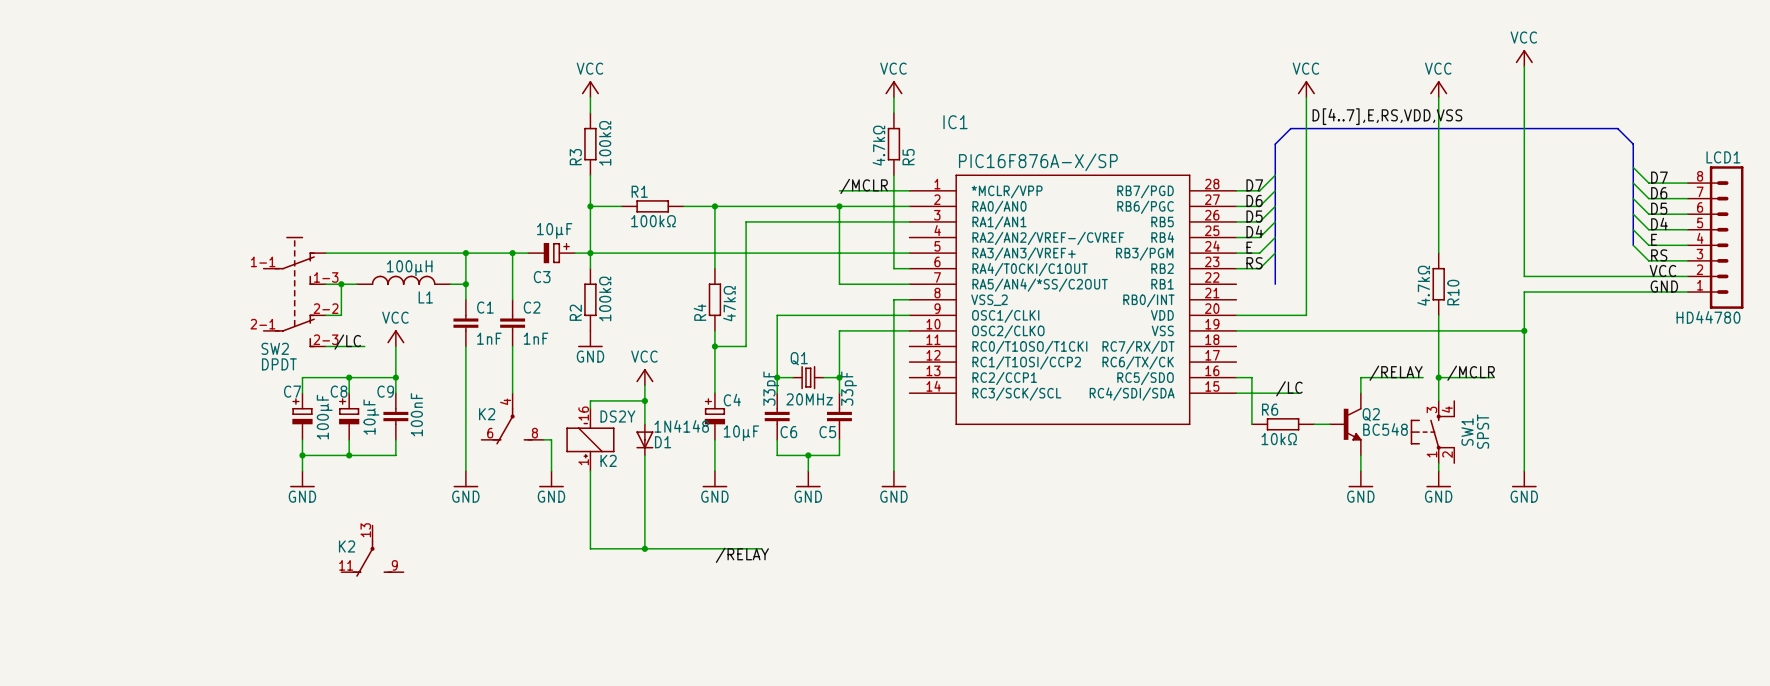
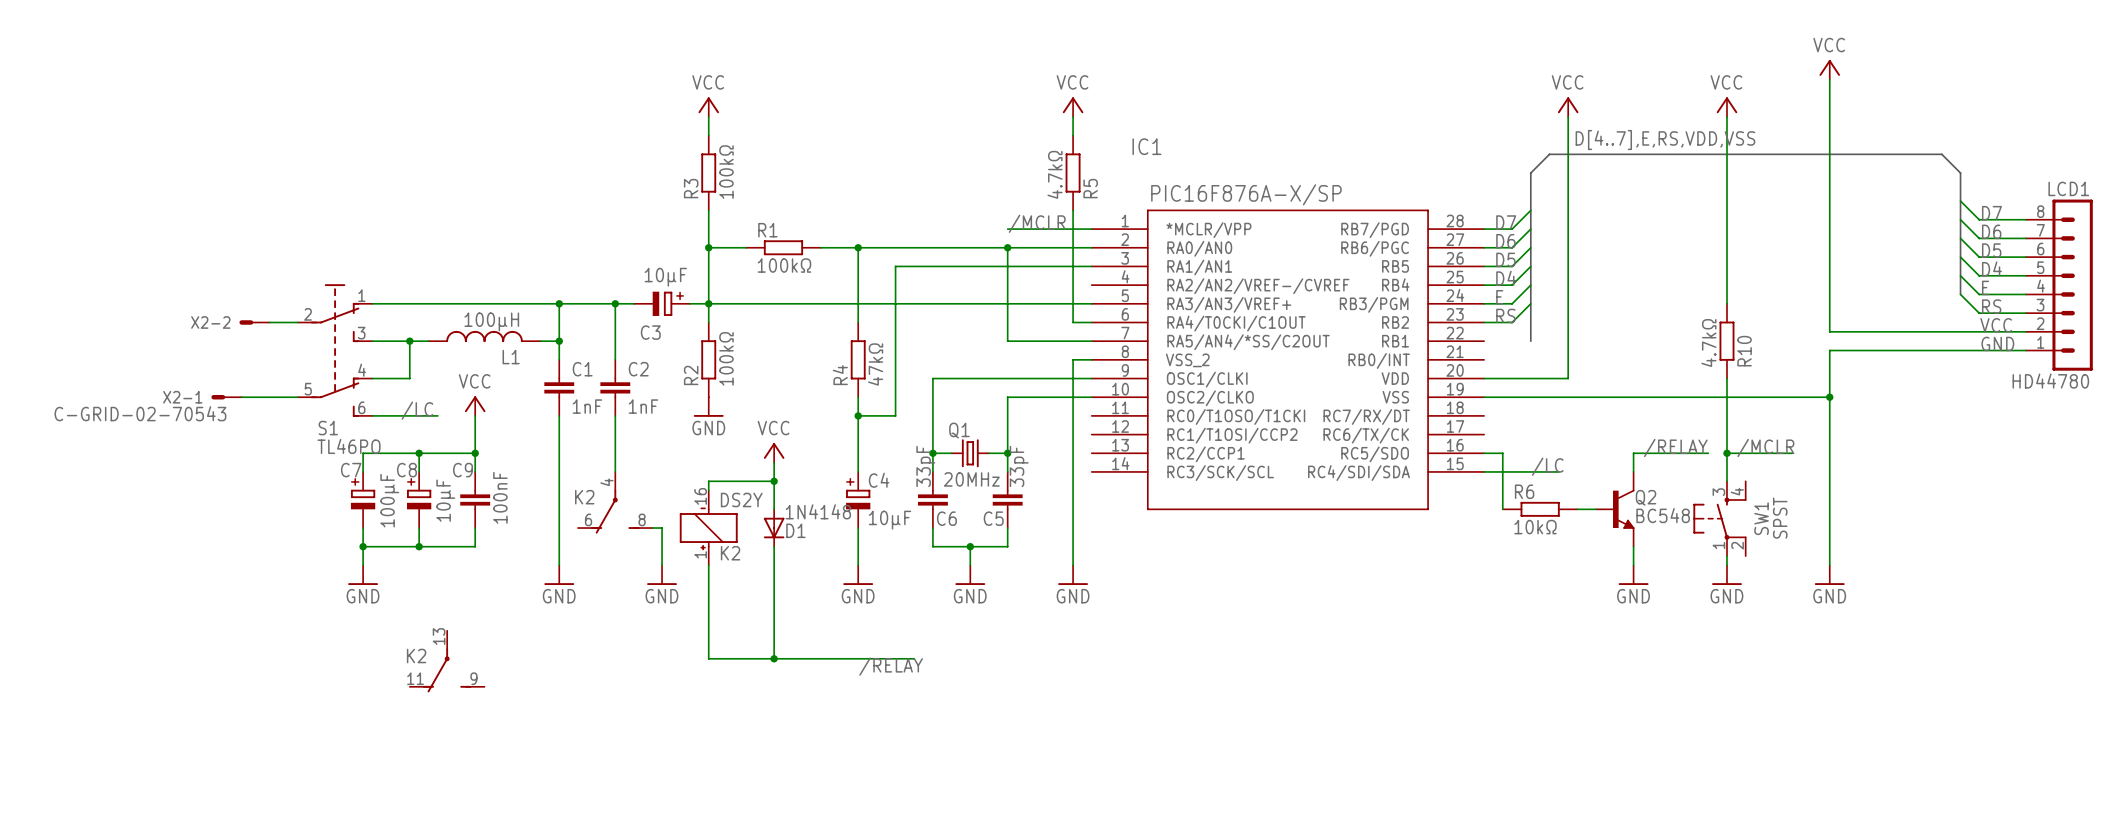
X2-2: none -> (254, 322)
wire: none -> (269, 322) (297, 322)
S1: none -> TL46PO (335, 350)
SW2: DPDT (294, 292) -> none
X2-1: none -> C-GRID-02-70543 (226, 397)
wire: none -> (241, 397) (297, 397)

